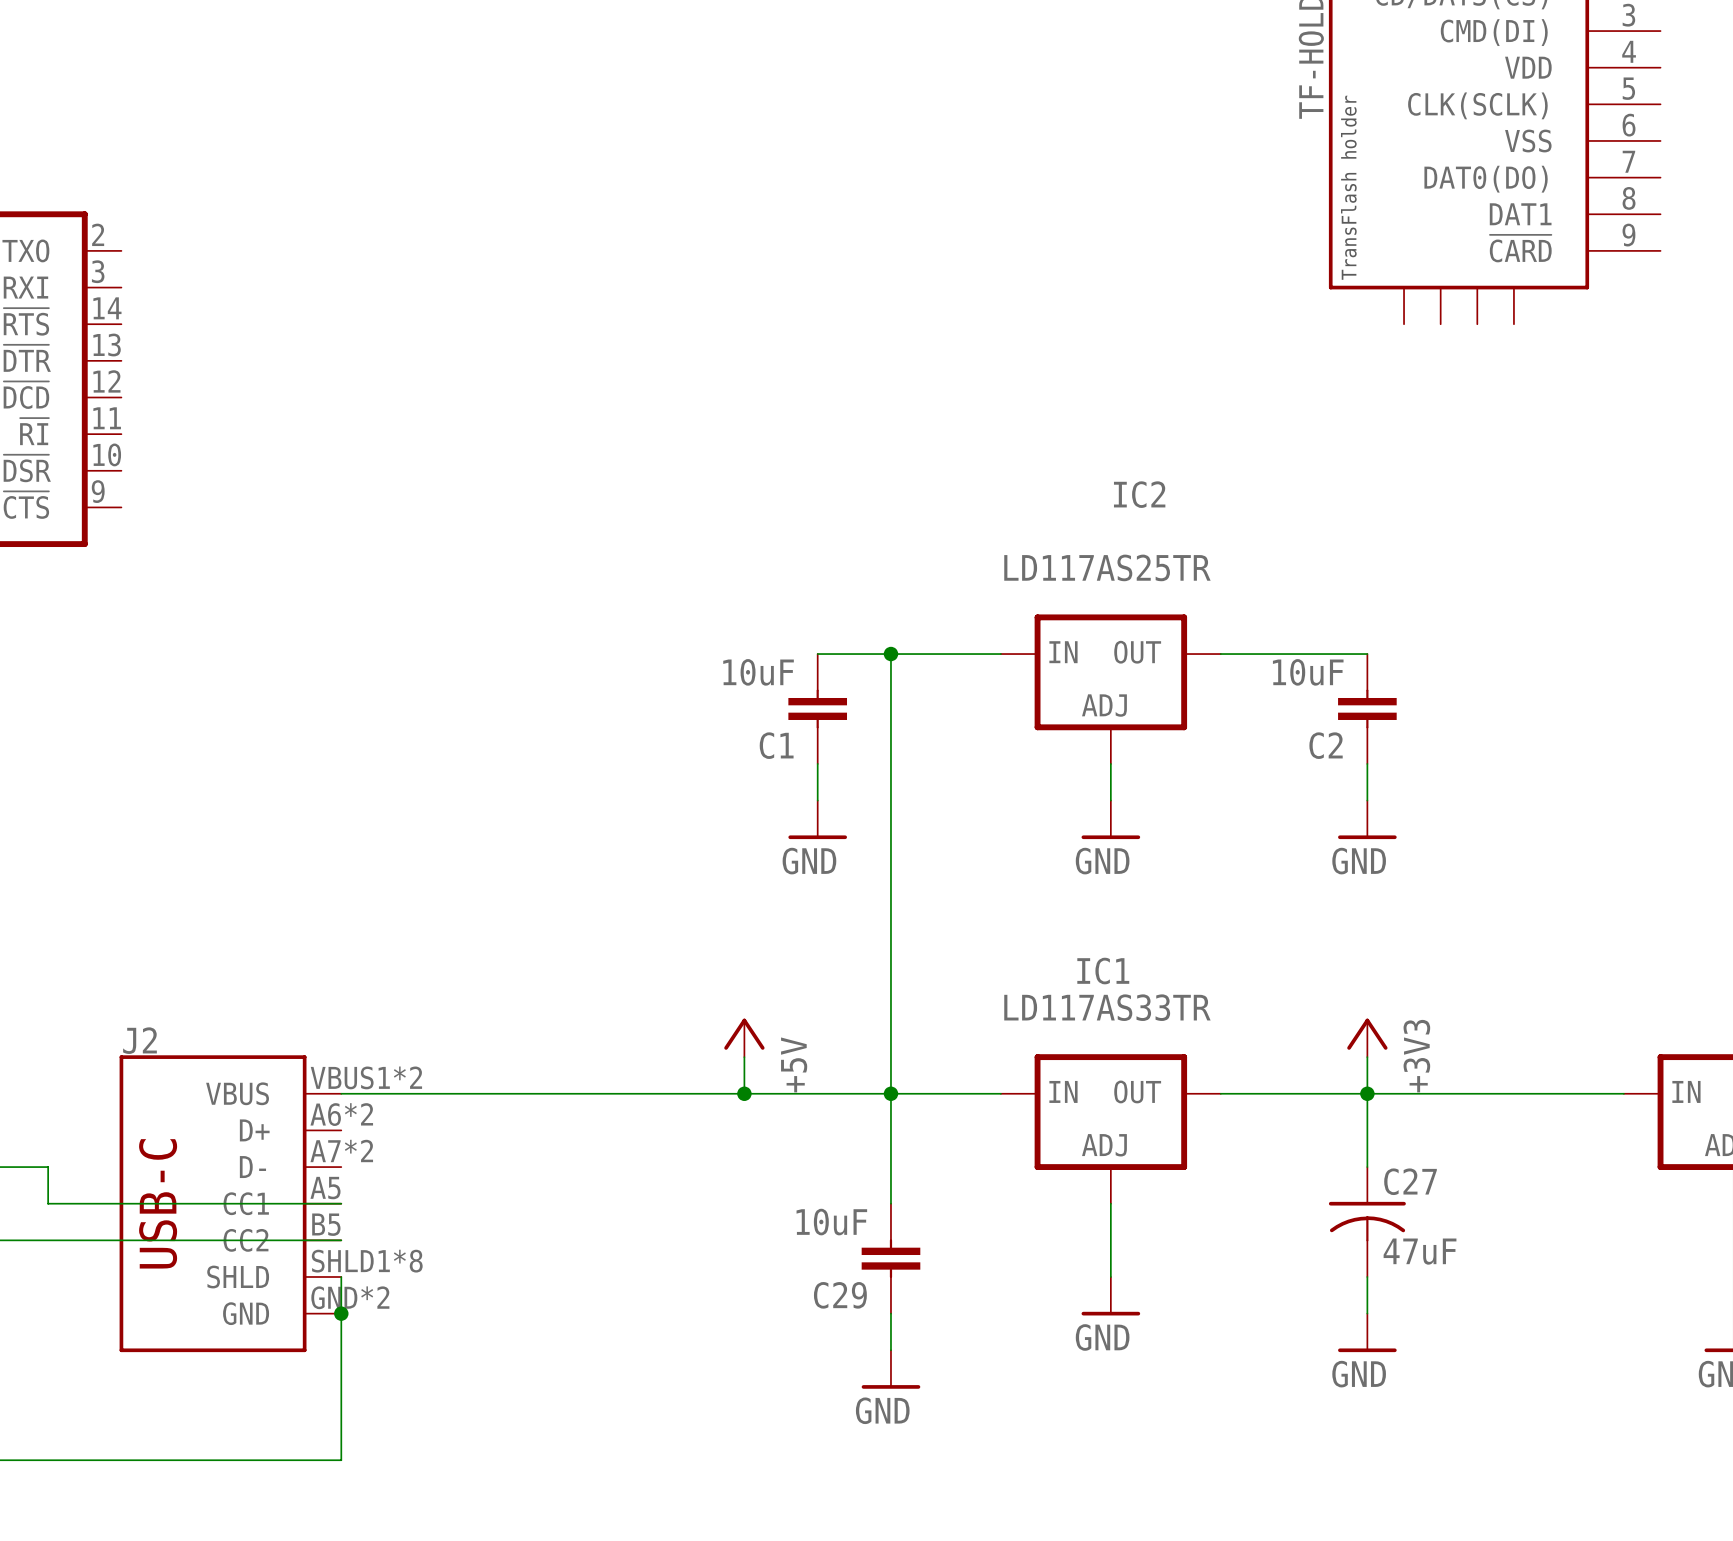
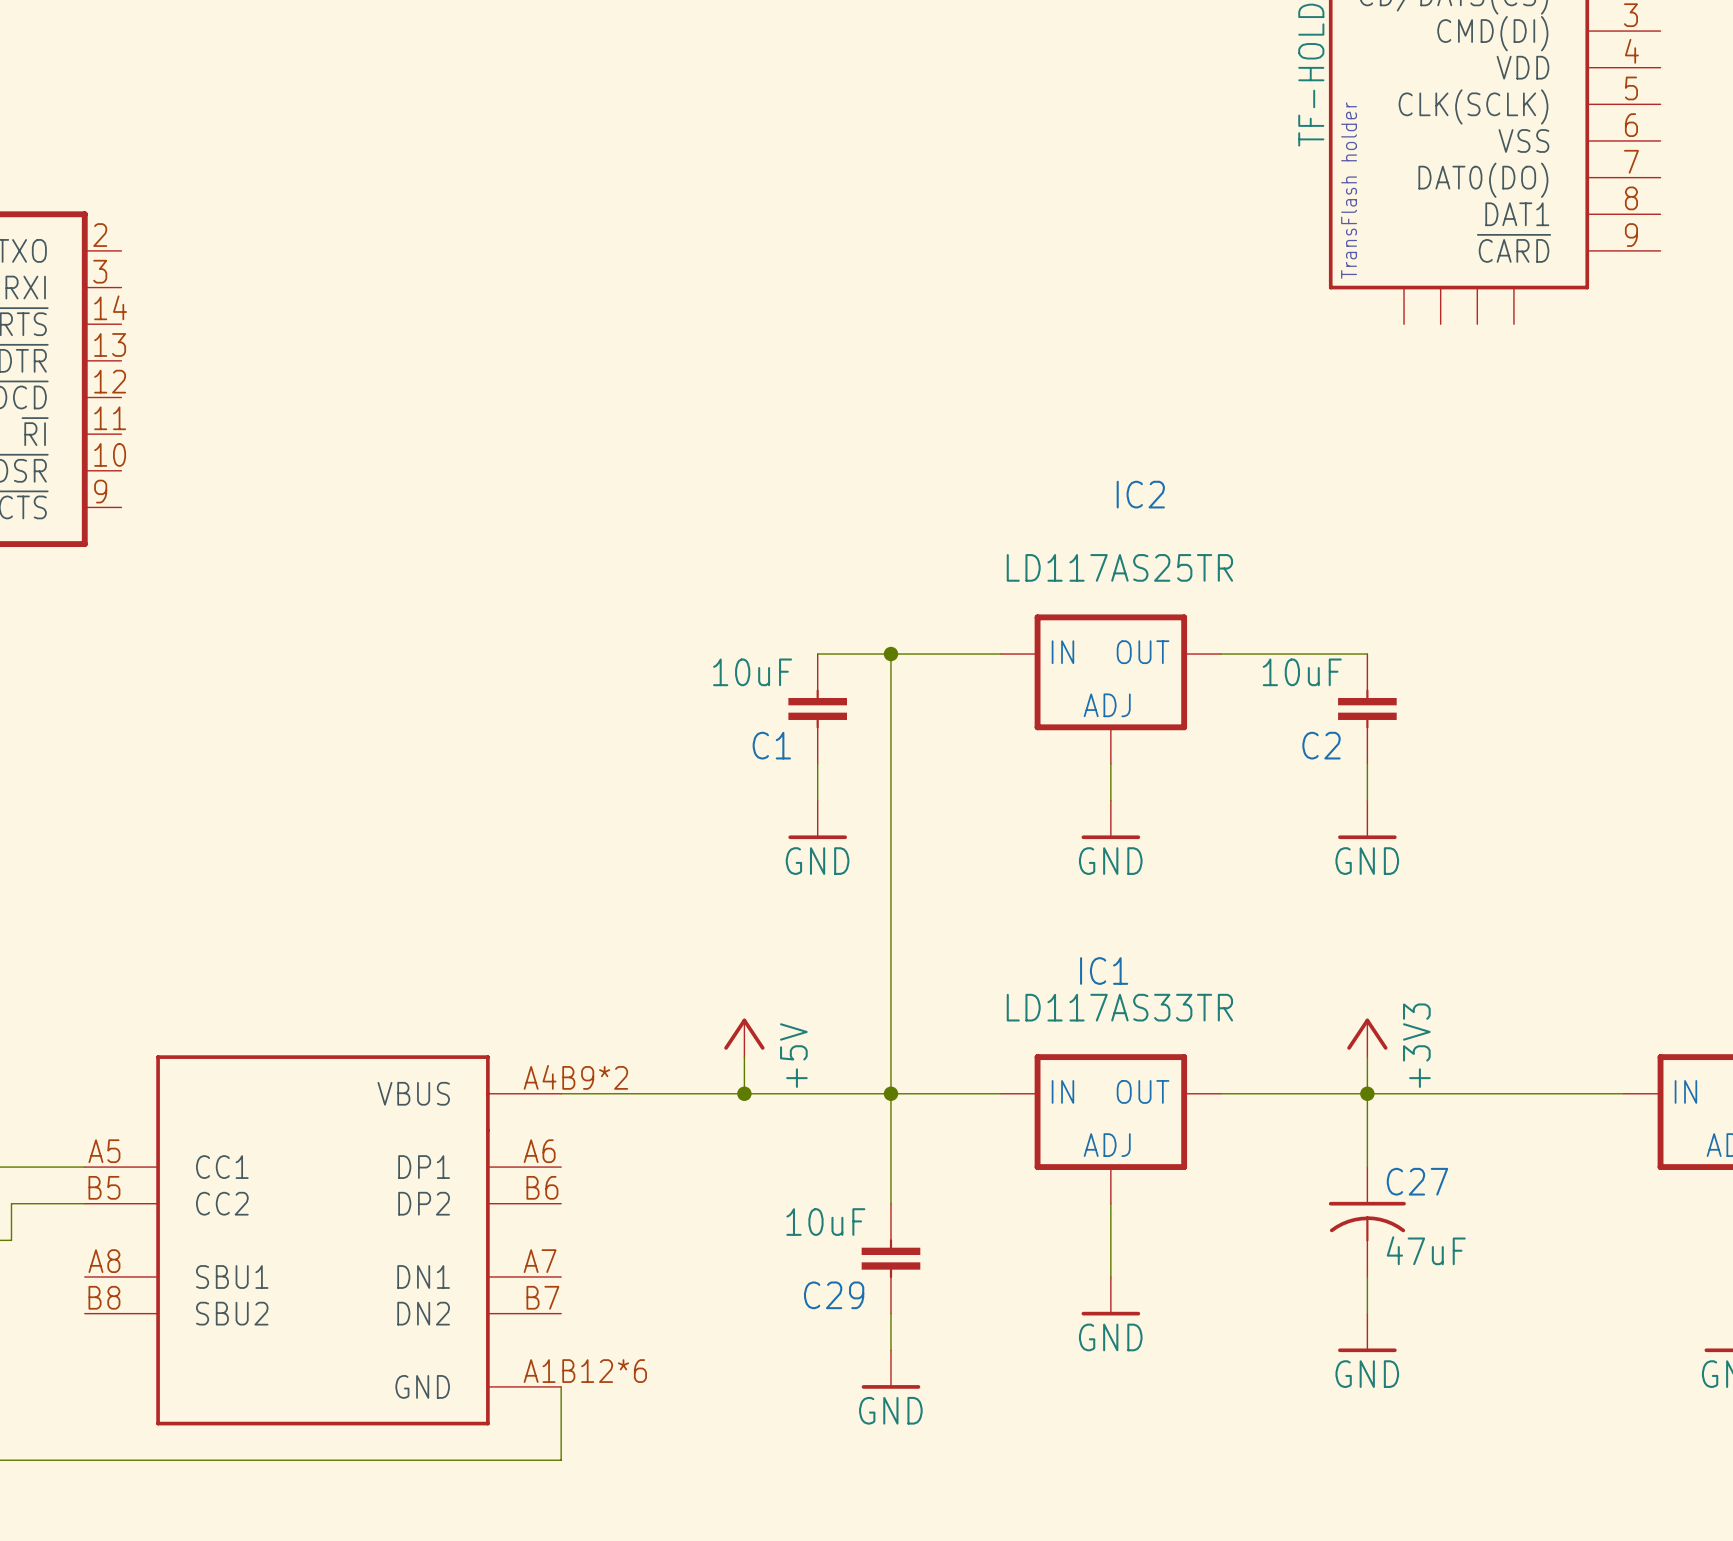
wire: (341, 1093) (561, 1093) -> none
wire: (48, 1167) (48, 1203) -> (48, 1167) (84, 1167)
wire: (84, 1203) (341, 1203) -> none
J2: (230, 1203) -> none
wire: (11, 1240) (341, 1240) -> (11, 1240) (11, 1203) (48, 1203)
part: none -> (322, 1240)
wire: (341, 1276) (341, 1460) -> (561, 1386) (561, 1460) (341, 1460)
junction: (341, 1313) -> none

